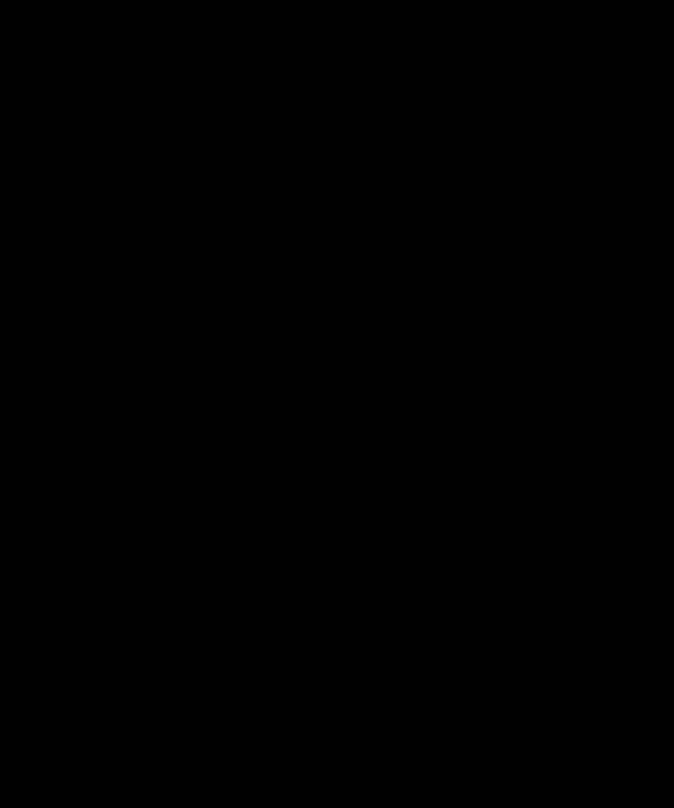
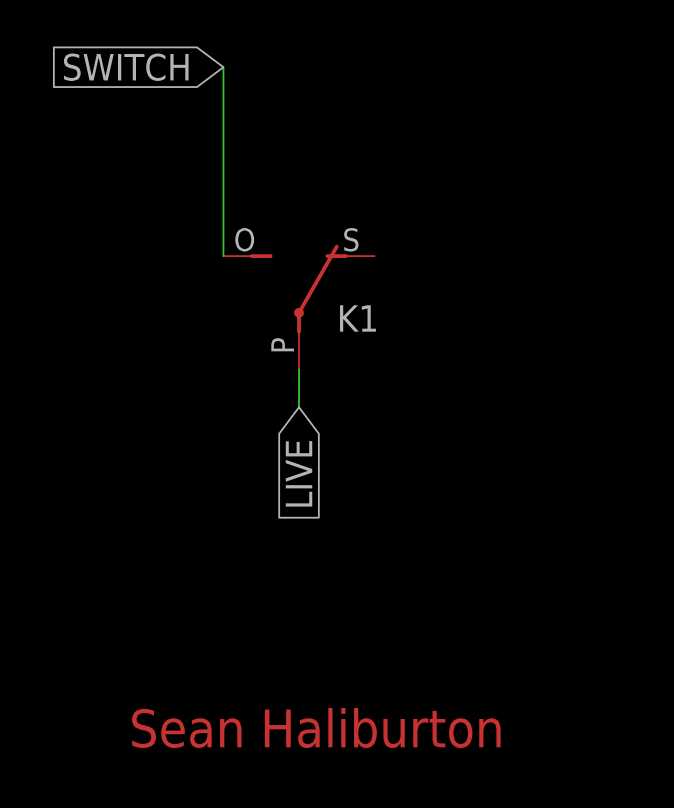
global label: none -> SWITCH (126, 67)
wire: none -> (223, 67) (223, 256)
K1: none -> (299, 307)
wire: none -> (299, 369) (299, 407)
global label: none -> LIVE (299, 473)
text: none -> Sean Haliburton (316, 727)

